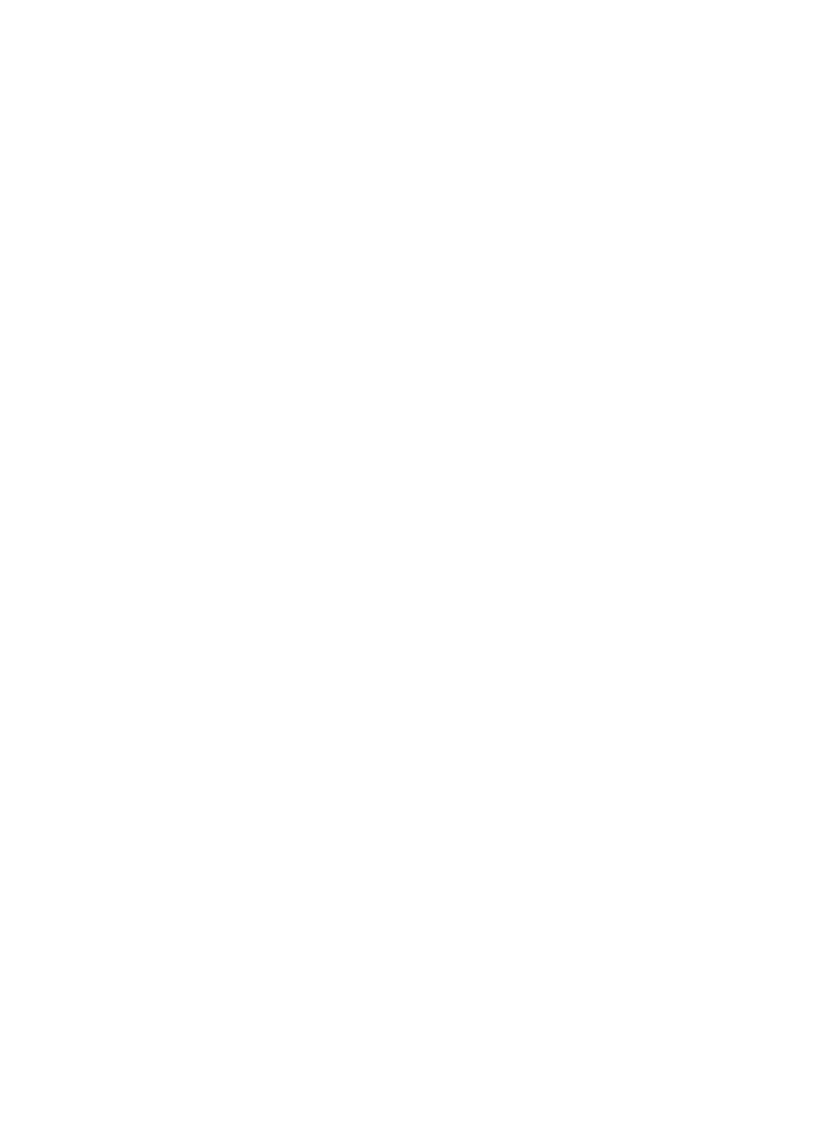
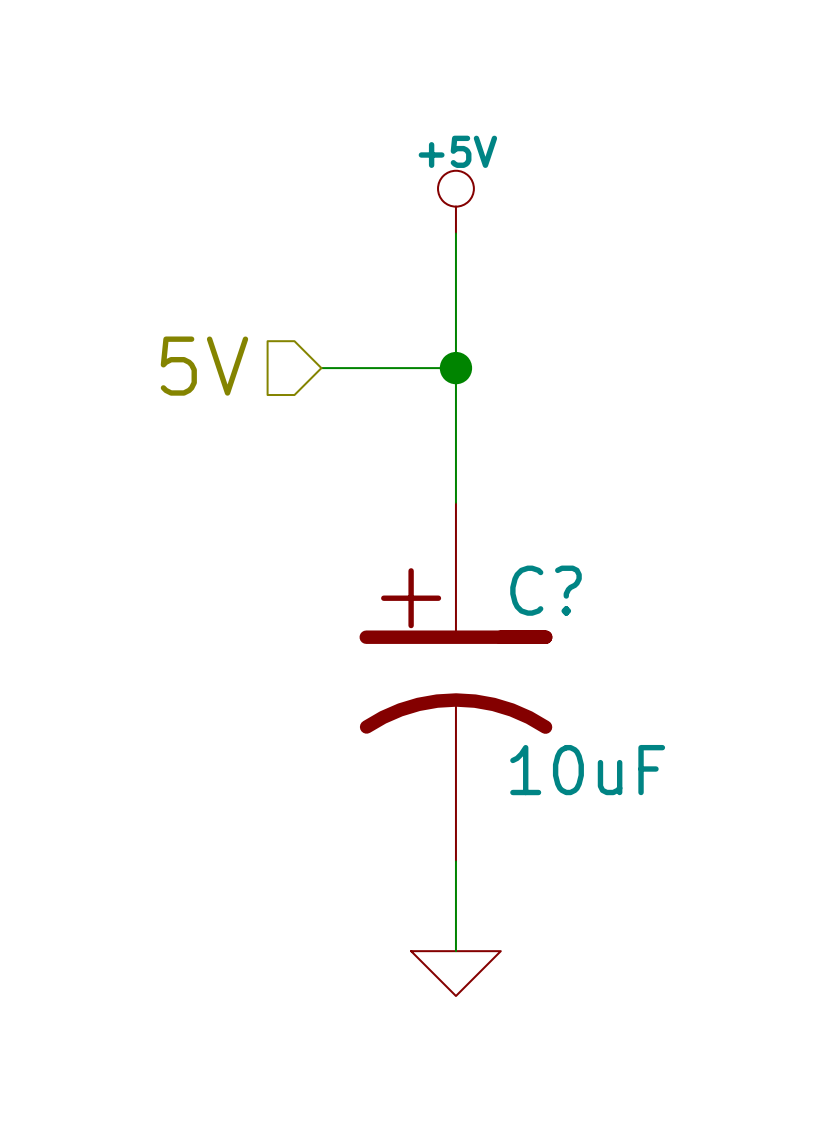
power symbol: none -> +5V (455, 202)
wire: none -> (455, 233) (455, 502)
hierarchical label: none -> 5V (204, 366)
wire: none -> (321, 368) (455, 368)
junction: none -> (455, 368)
C?: none -> 10uF (455, 682)
wire: none -> (455, 861) (455, 951)
power symbol: none -> (455, 973)

